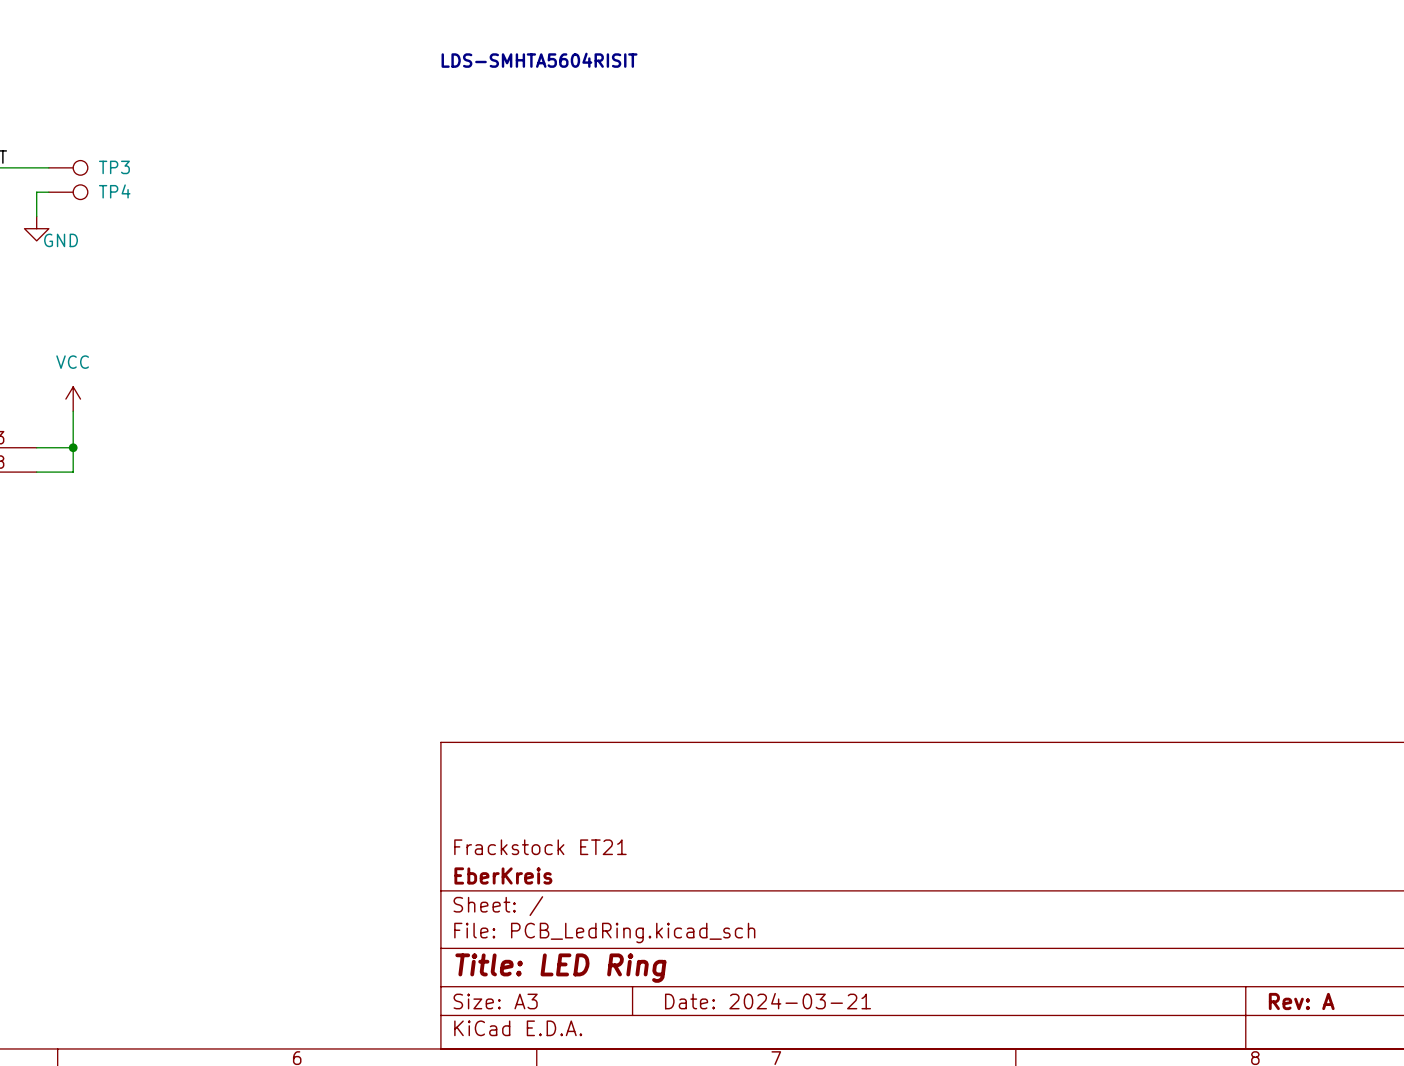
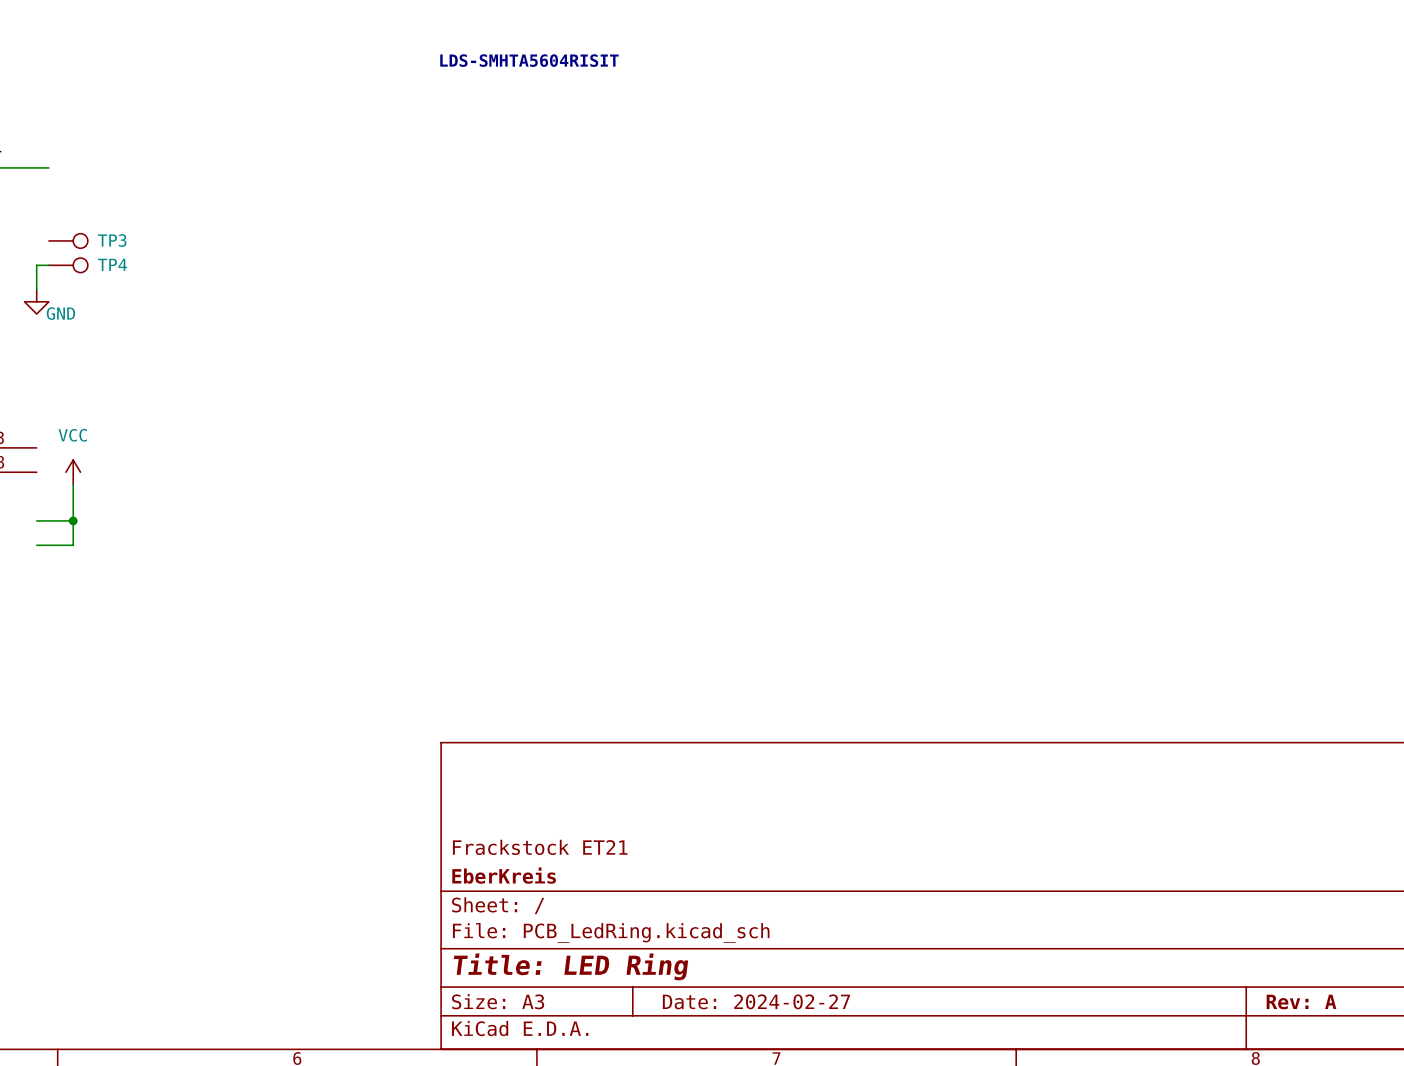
TP3 position: (68, 167) -> (68, 240)
wire: (48, 192) (36, 192) (36, 216) -> (48, 265) (36, 265) (36, 289)
TP4 position: (68, 192) -> (68, 265)
power symbol position: GND (36, 228) -> GND (36, 301)
power symbol position: VCC (73, 399) -> VCC (73, 472)
wire: (73, 411) (73, 472) (36, 472) -> (73, 484) (73, 545) (36, 545)
wire: (36, 447) (73, 447) -> (36, 520) (73, 520)
junction: (73, 447) -> none
junction: none -> (73, 520)
title block: Date: 2024-03-21 (768, 1001) -> Date: 2024-02-27 (756, 1001)

